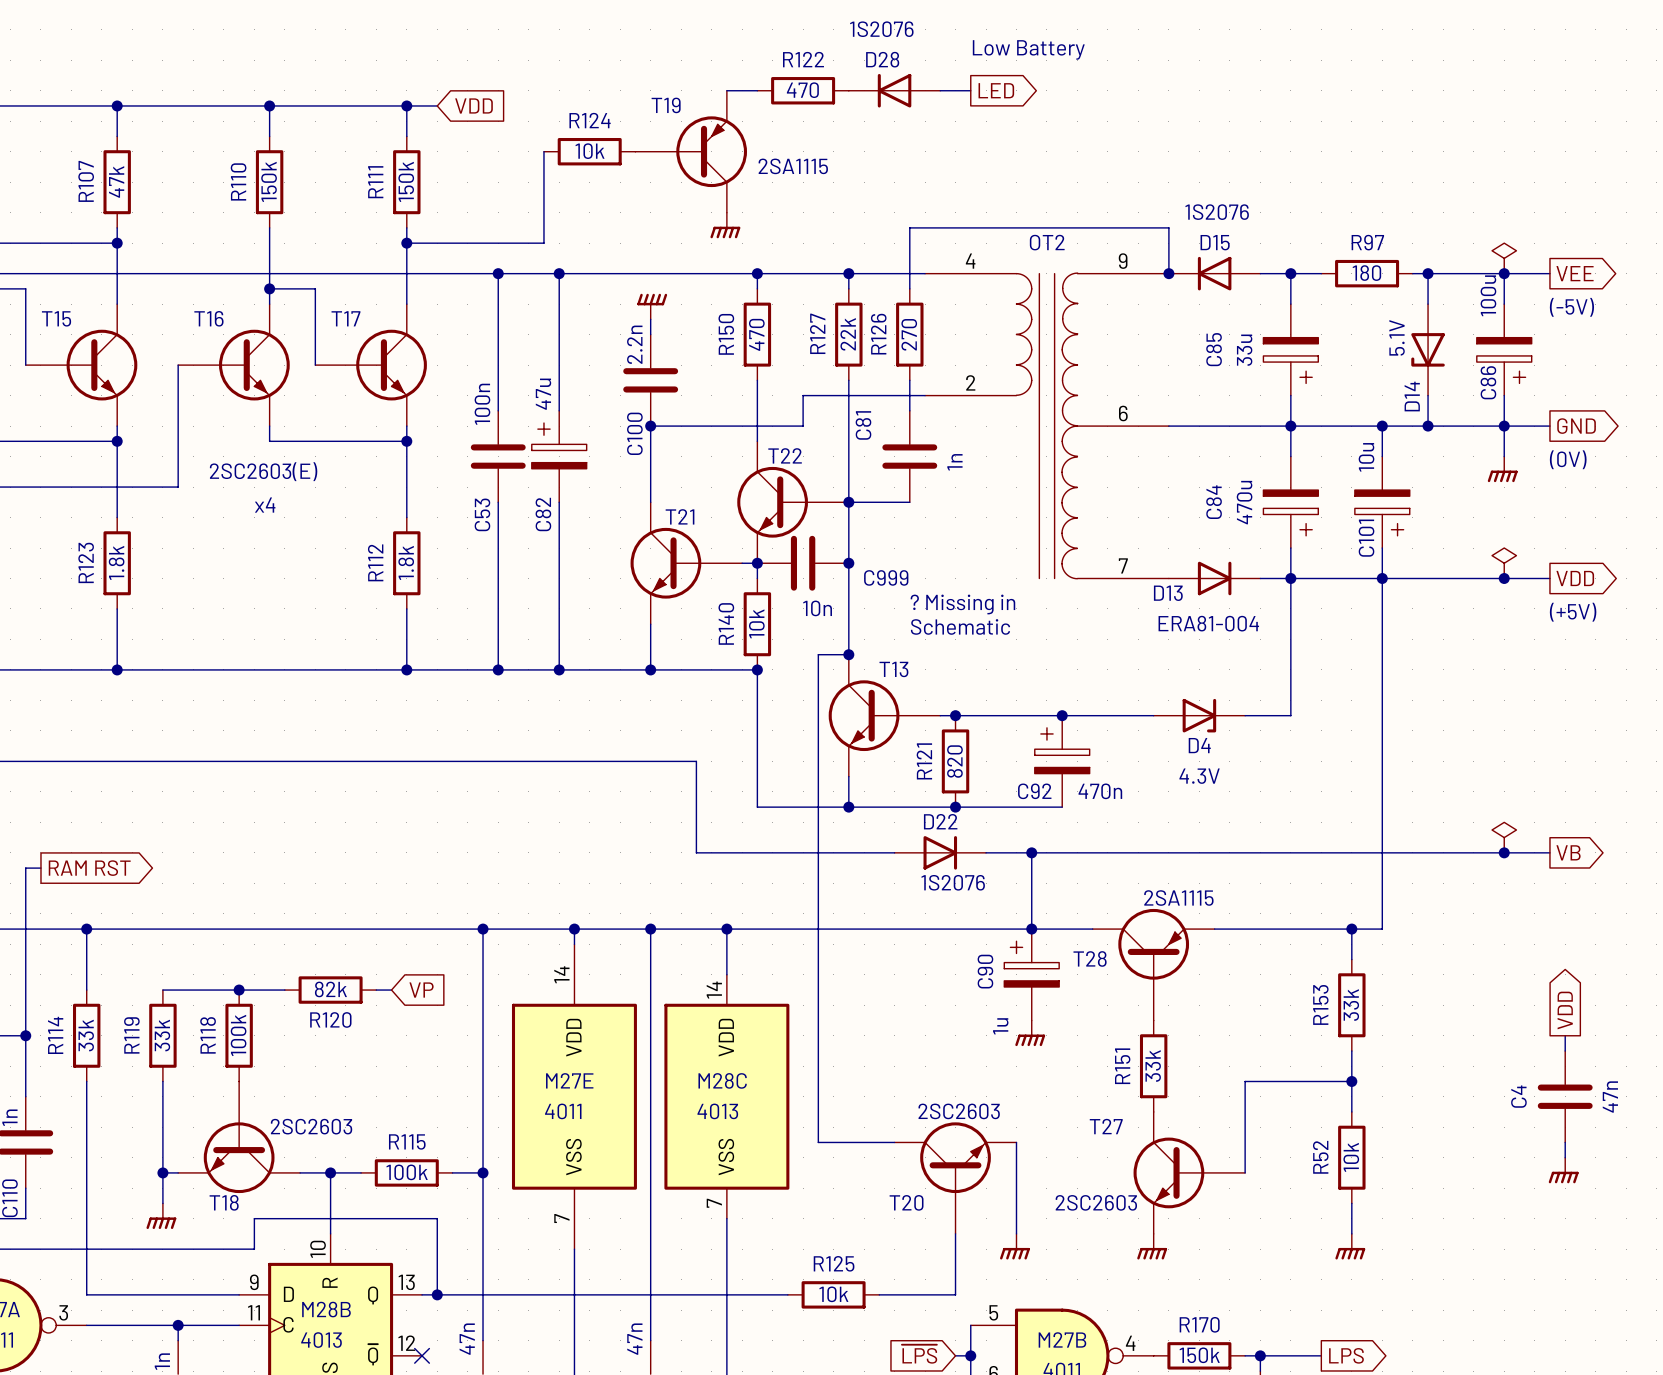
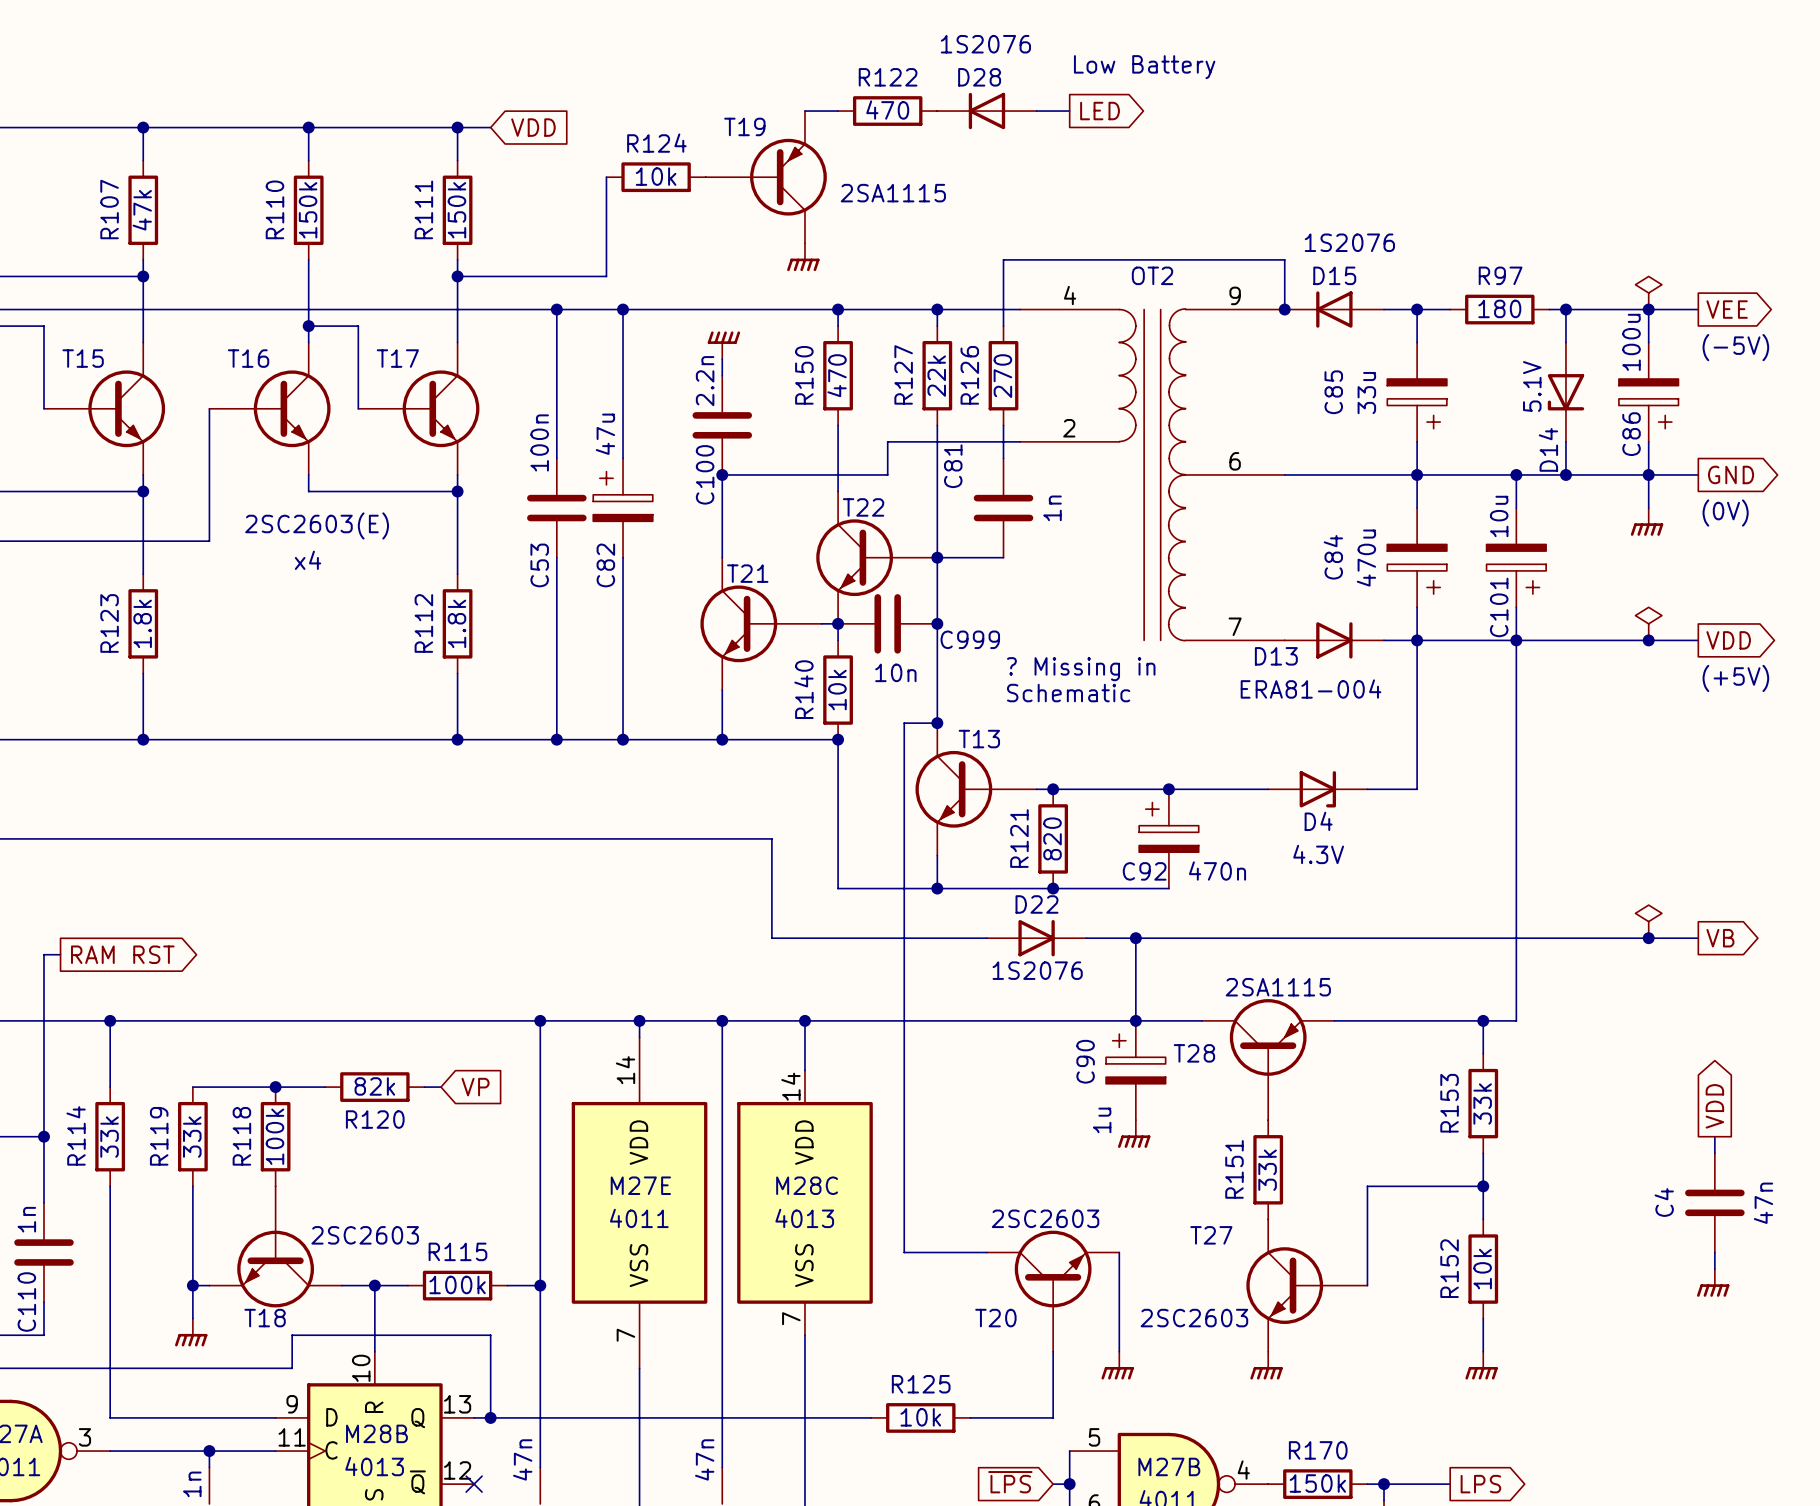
R52 name: R52 (1320, 1157) -> R152 (1449, 1268)

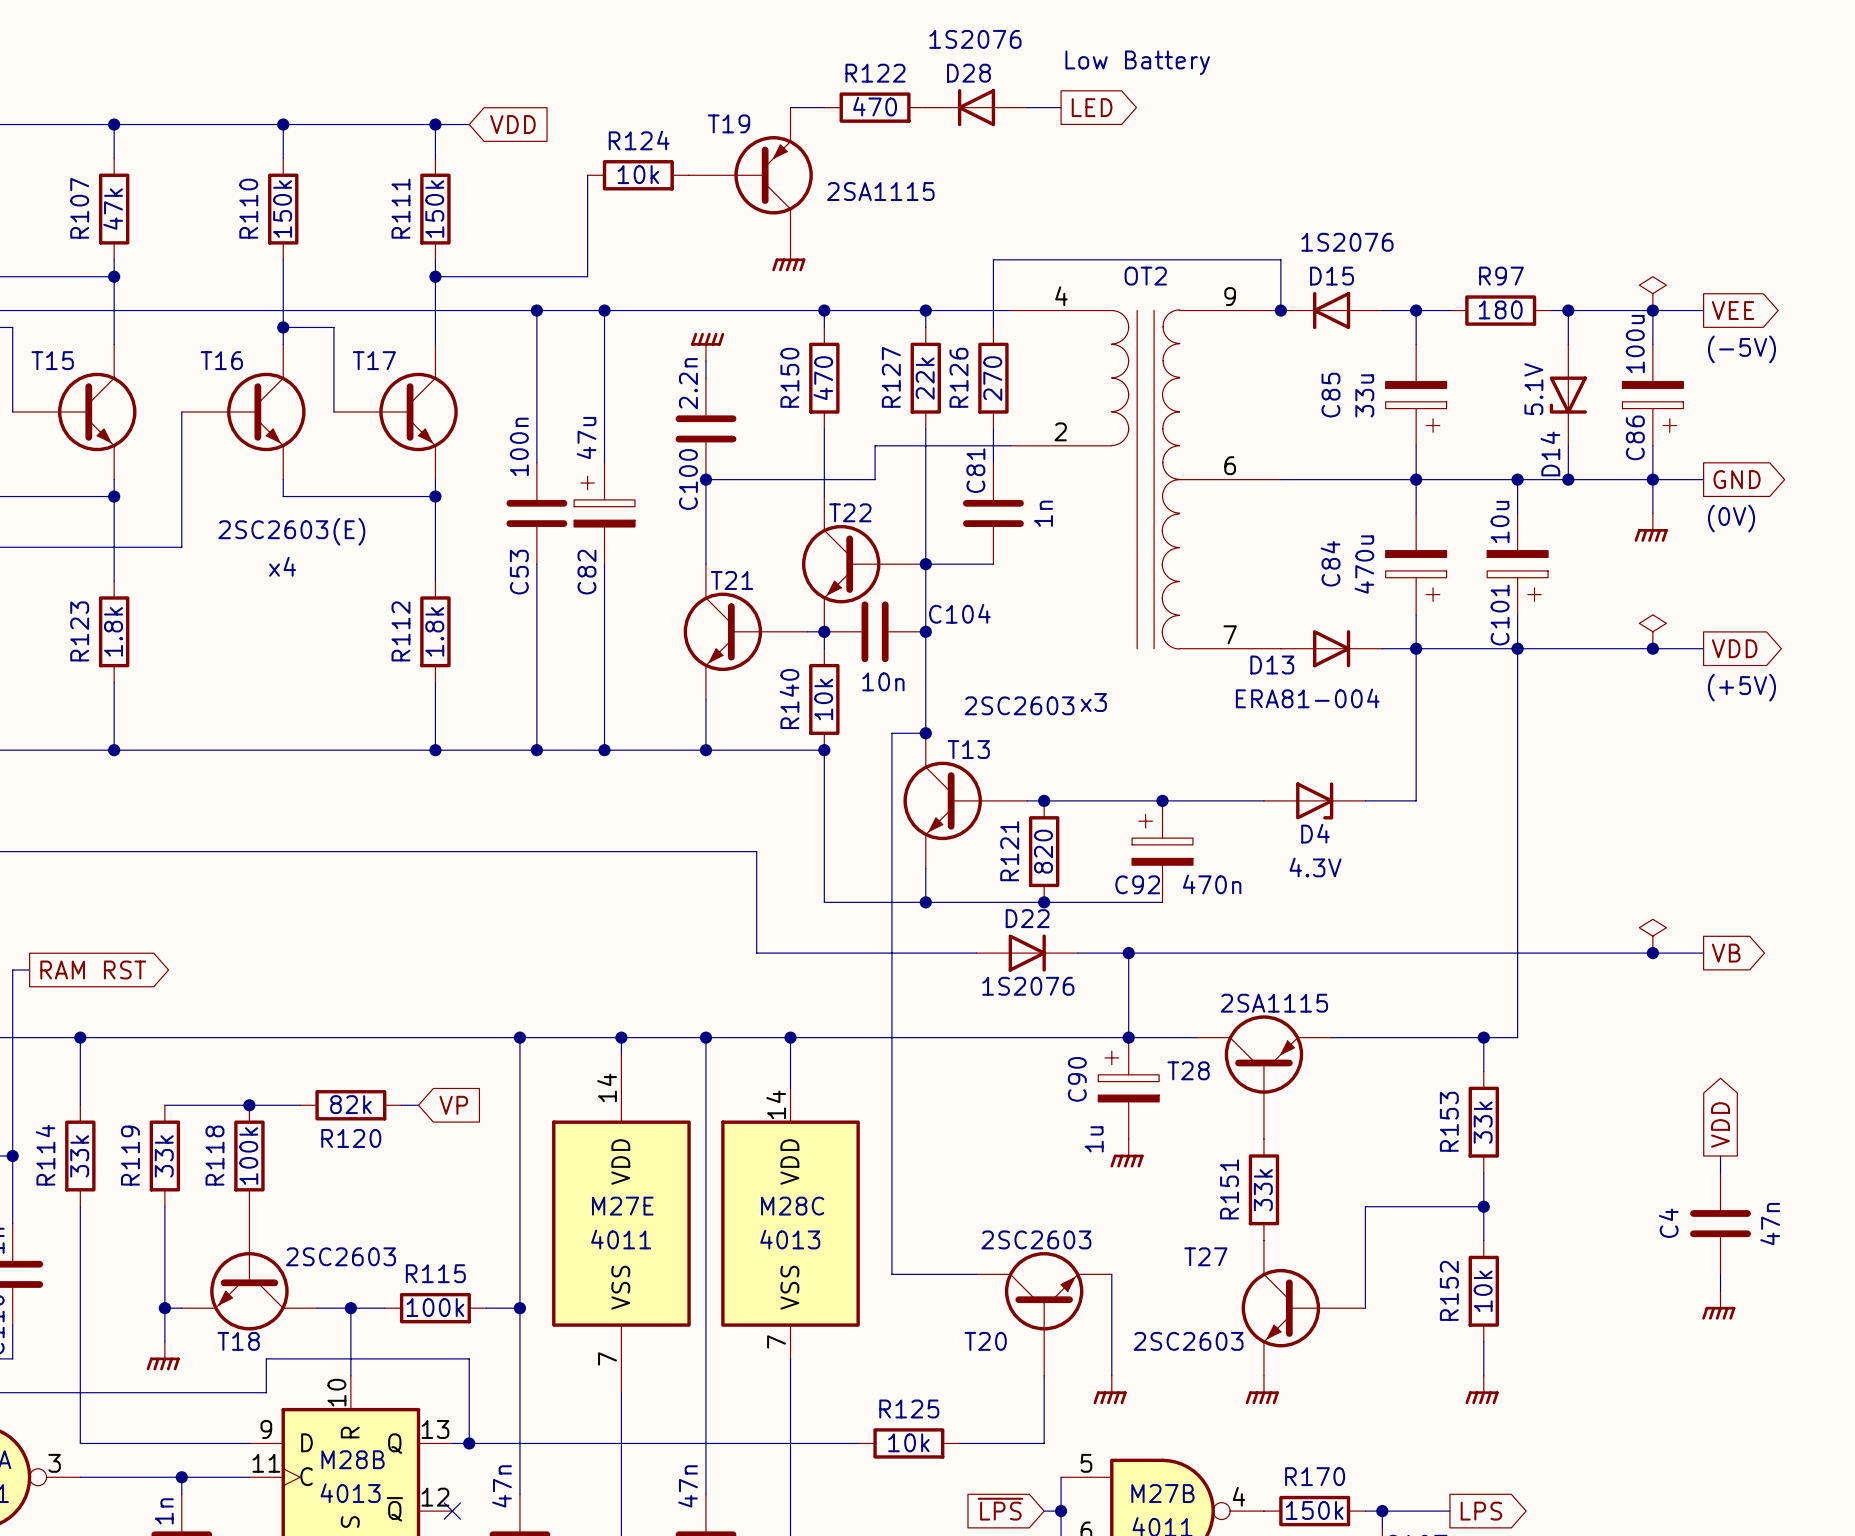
C81 name position: C81 (953, 466) -> C81 (975, 470)
C999 name: C999 (970, 639) -> C104 (959, 613)
text: ? Missing in (1081, 669) -> none
text: Schematic (1068, 693) -> none
text: none -> x3 (1093, 702)
T13 value: none -> 2SC2603 (1019, 705)

